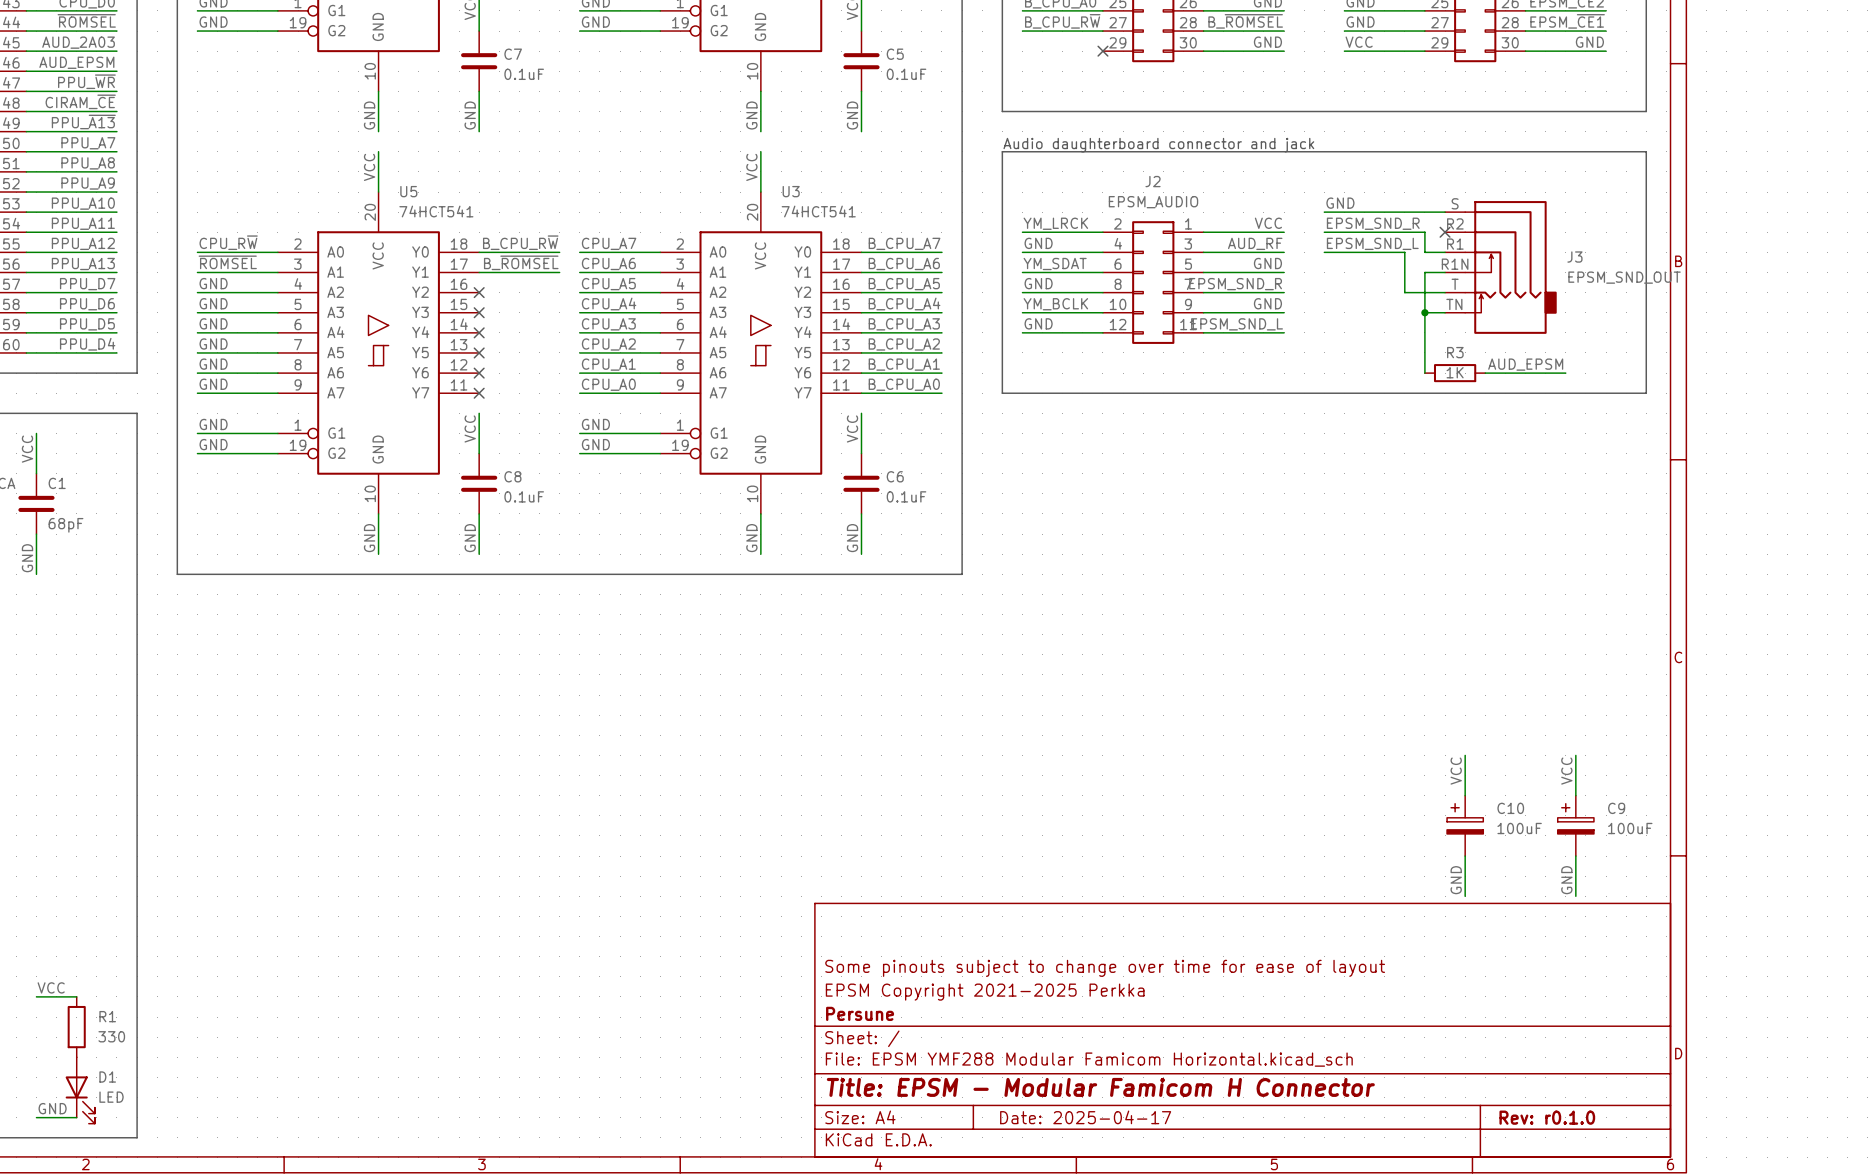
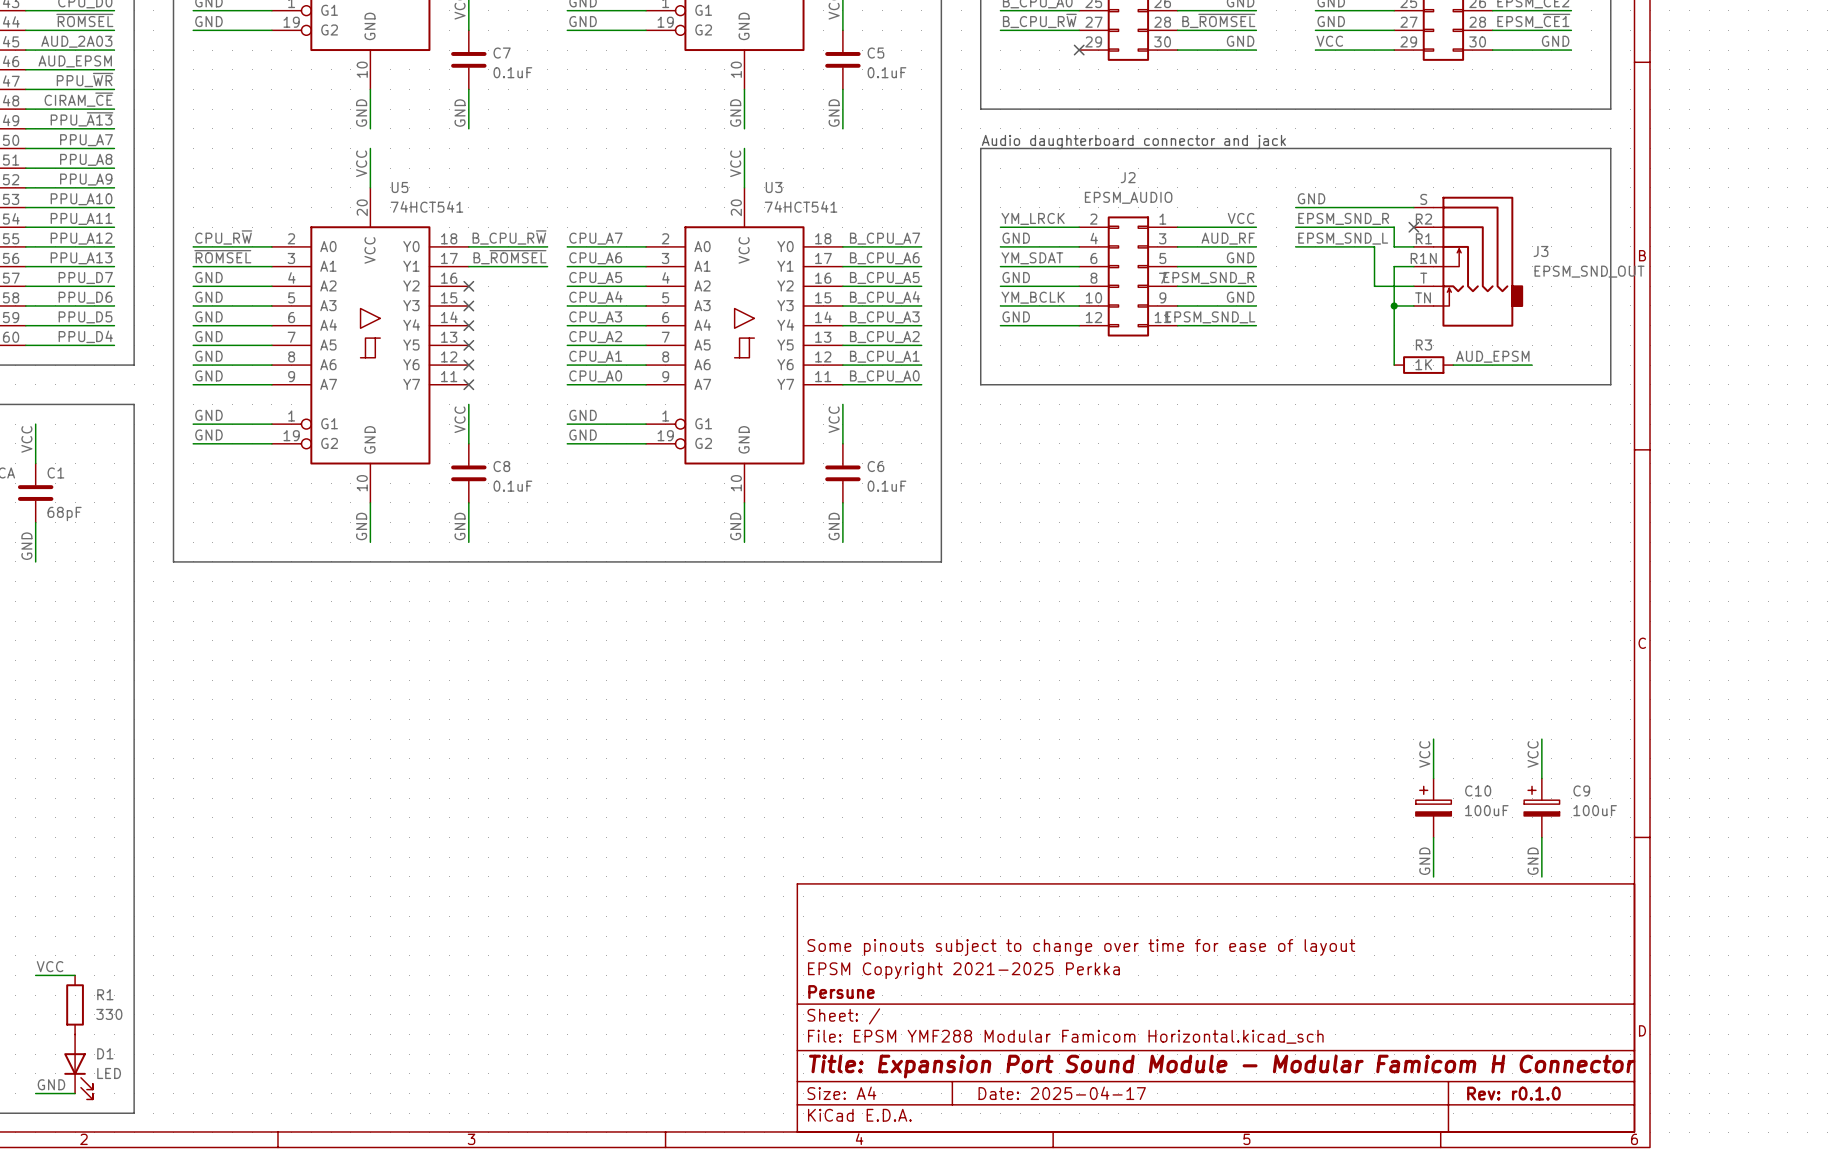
title block: Title: EPSM - Modular Famicom H Connector (1100, 1087) -> Title: Expansion Port Sound Module - Modular Famicom H Connector (1222, 1066)

